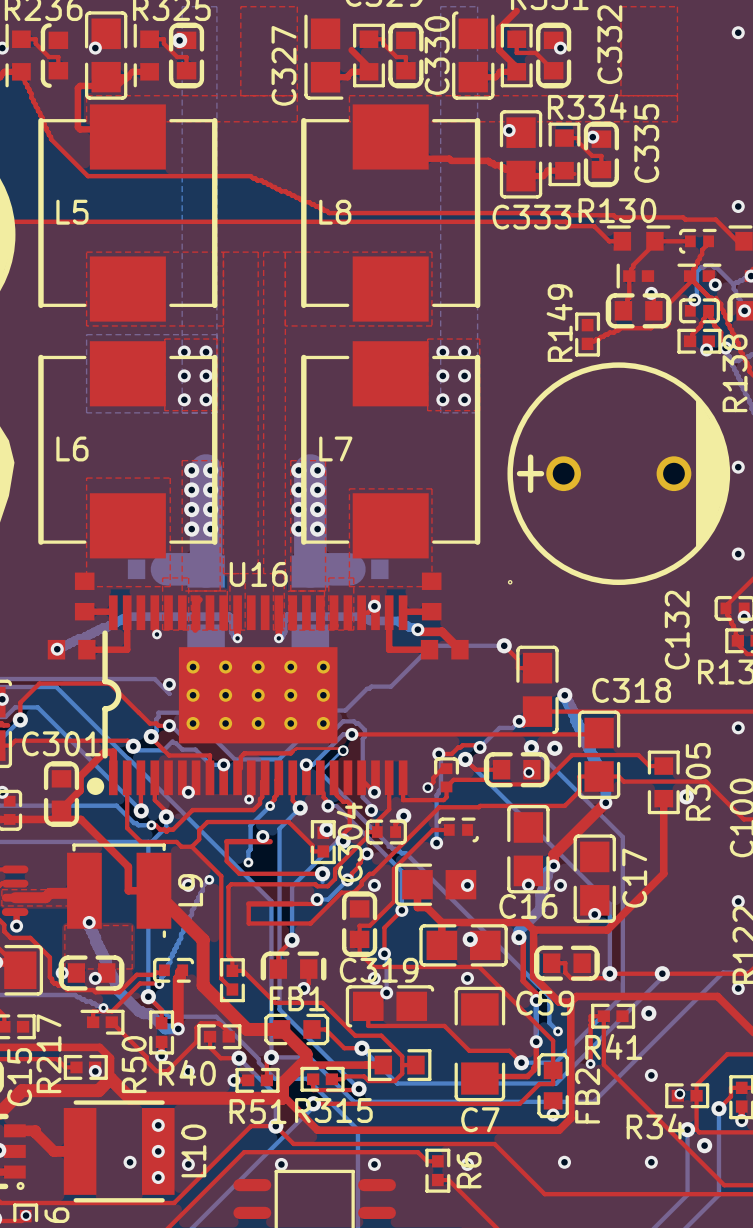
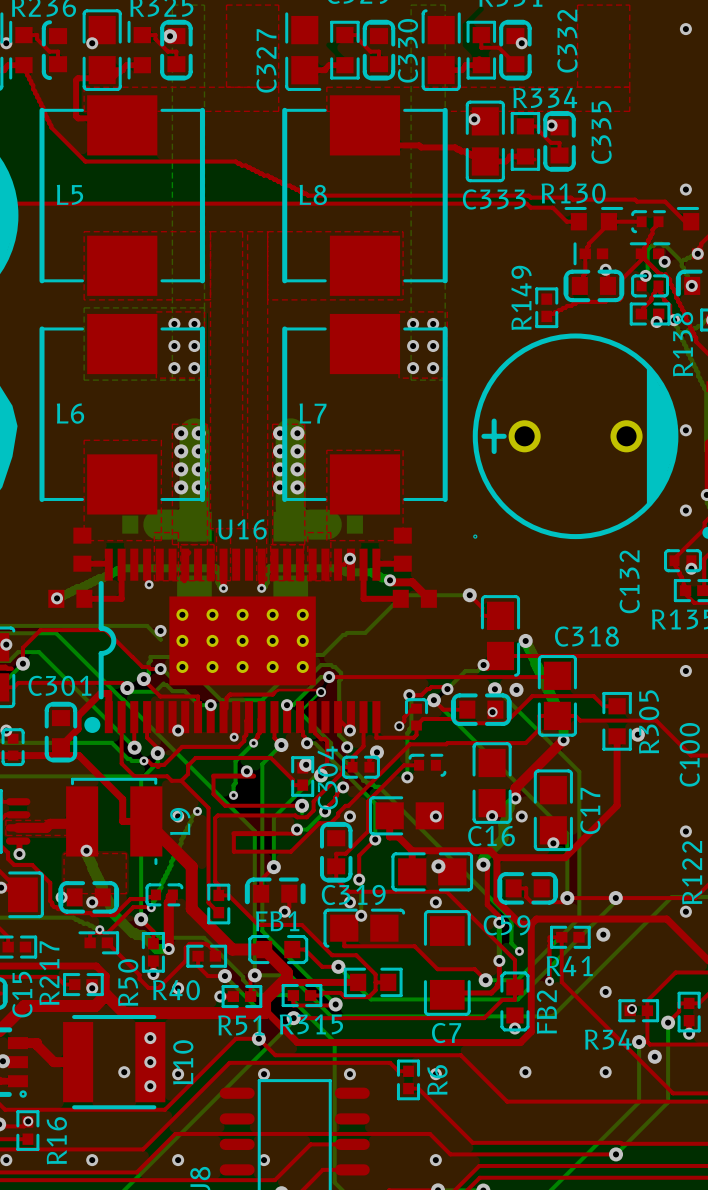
top track: (516, 10) (499, 28) (499, 50) (514, 65) -> none
top track: (351, 50) (368, 67) (368, 71) -> none

